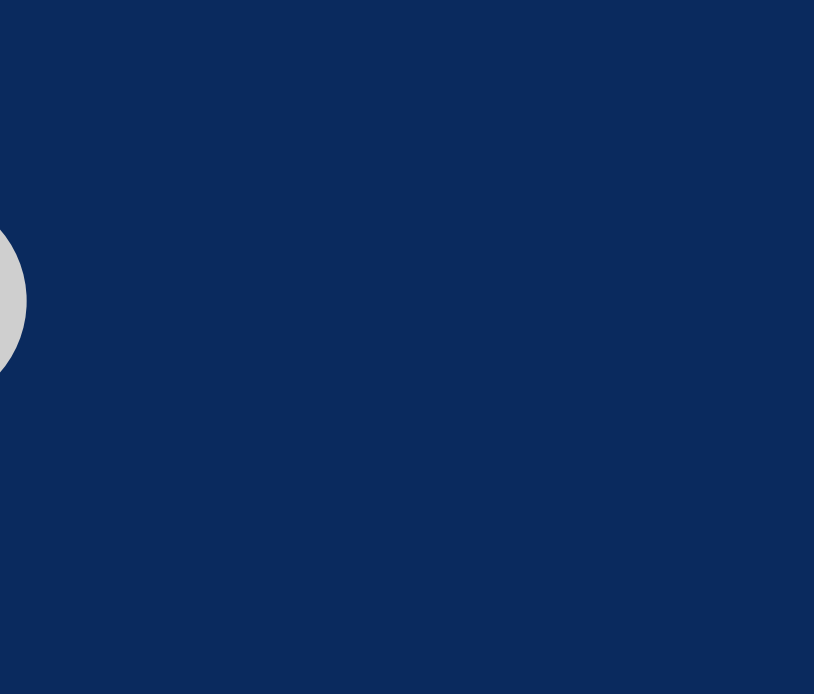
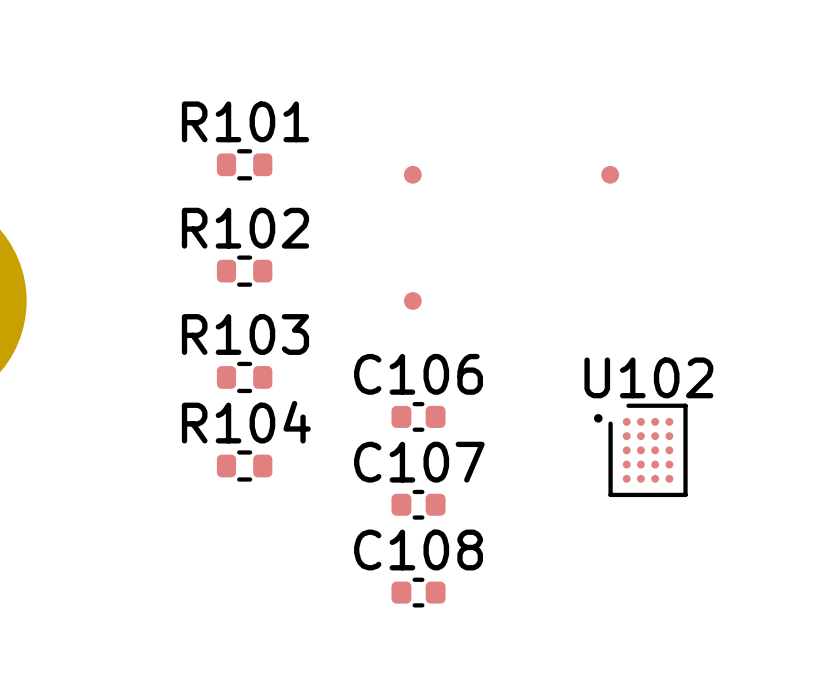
R101: none -> (244, 164)
part: none -> (412, 174)
part: none -> (610, 174)
R102: none -> (244, 271)
part: none -> (412, 300)
R103: none -> (244, 377)
C106: none -> (418, 416)
U102: none -> (640, 450)
R104: none -> (244, 465)
C107: none -> (418, 504)
C108: none -> (418, 592)

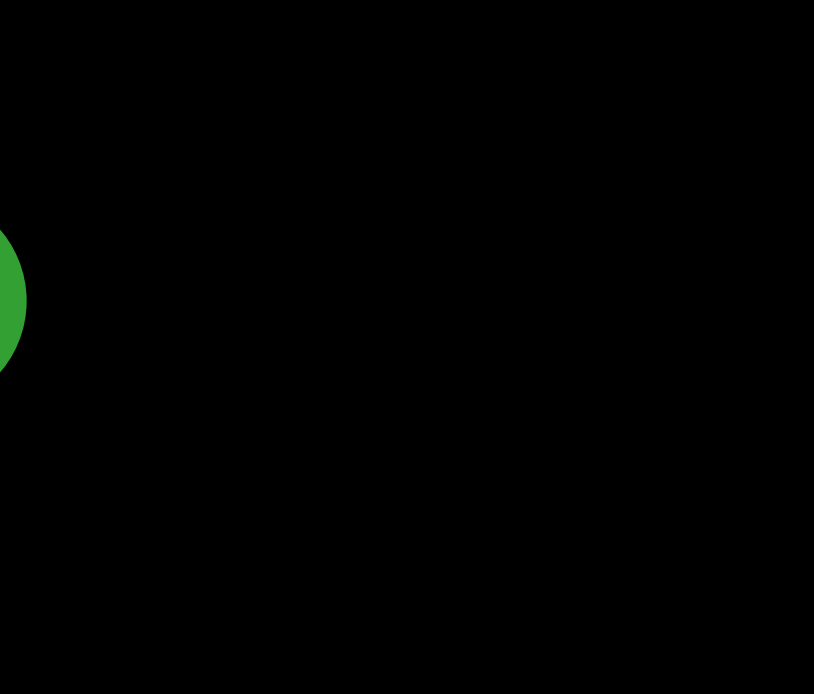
R101: (244, 164) -> none
part: (412, 174) -> none
part: (610, 174) -> none
R102: (244, 271) -> none
part: (412, 300) -> none
R103: (244, 377) -> none
C106: (418, 416) -> none
U102: (640, 450) -> none
R104: (244, 465) -> none
C107: (418, 504) -> none
C108: (418, 592) -> none

